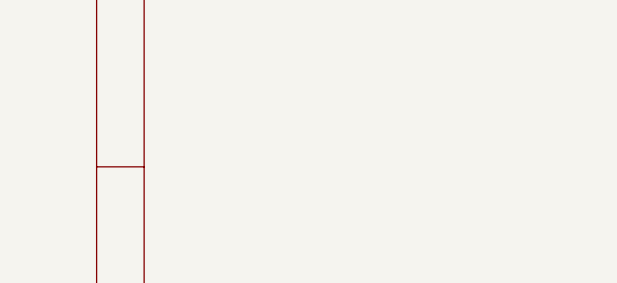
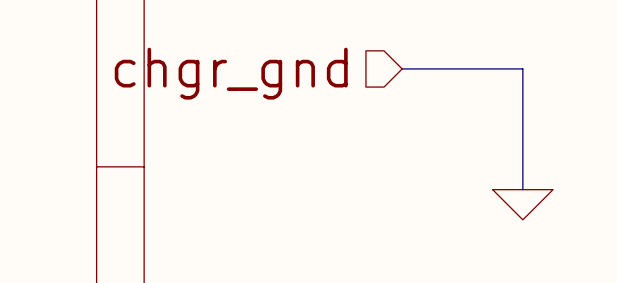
wire: none -> (402, 68) (522, 68) (522, 189)
hierarchical label: none -> chgr_gnd (231, 73)
power symbol: none -> (522, 204)

